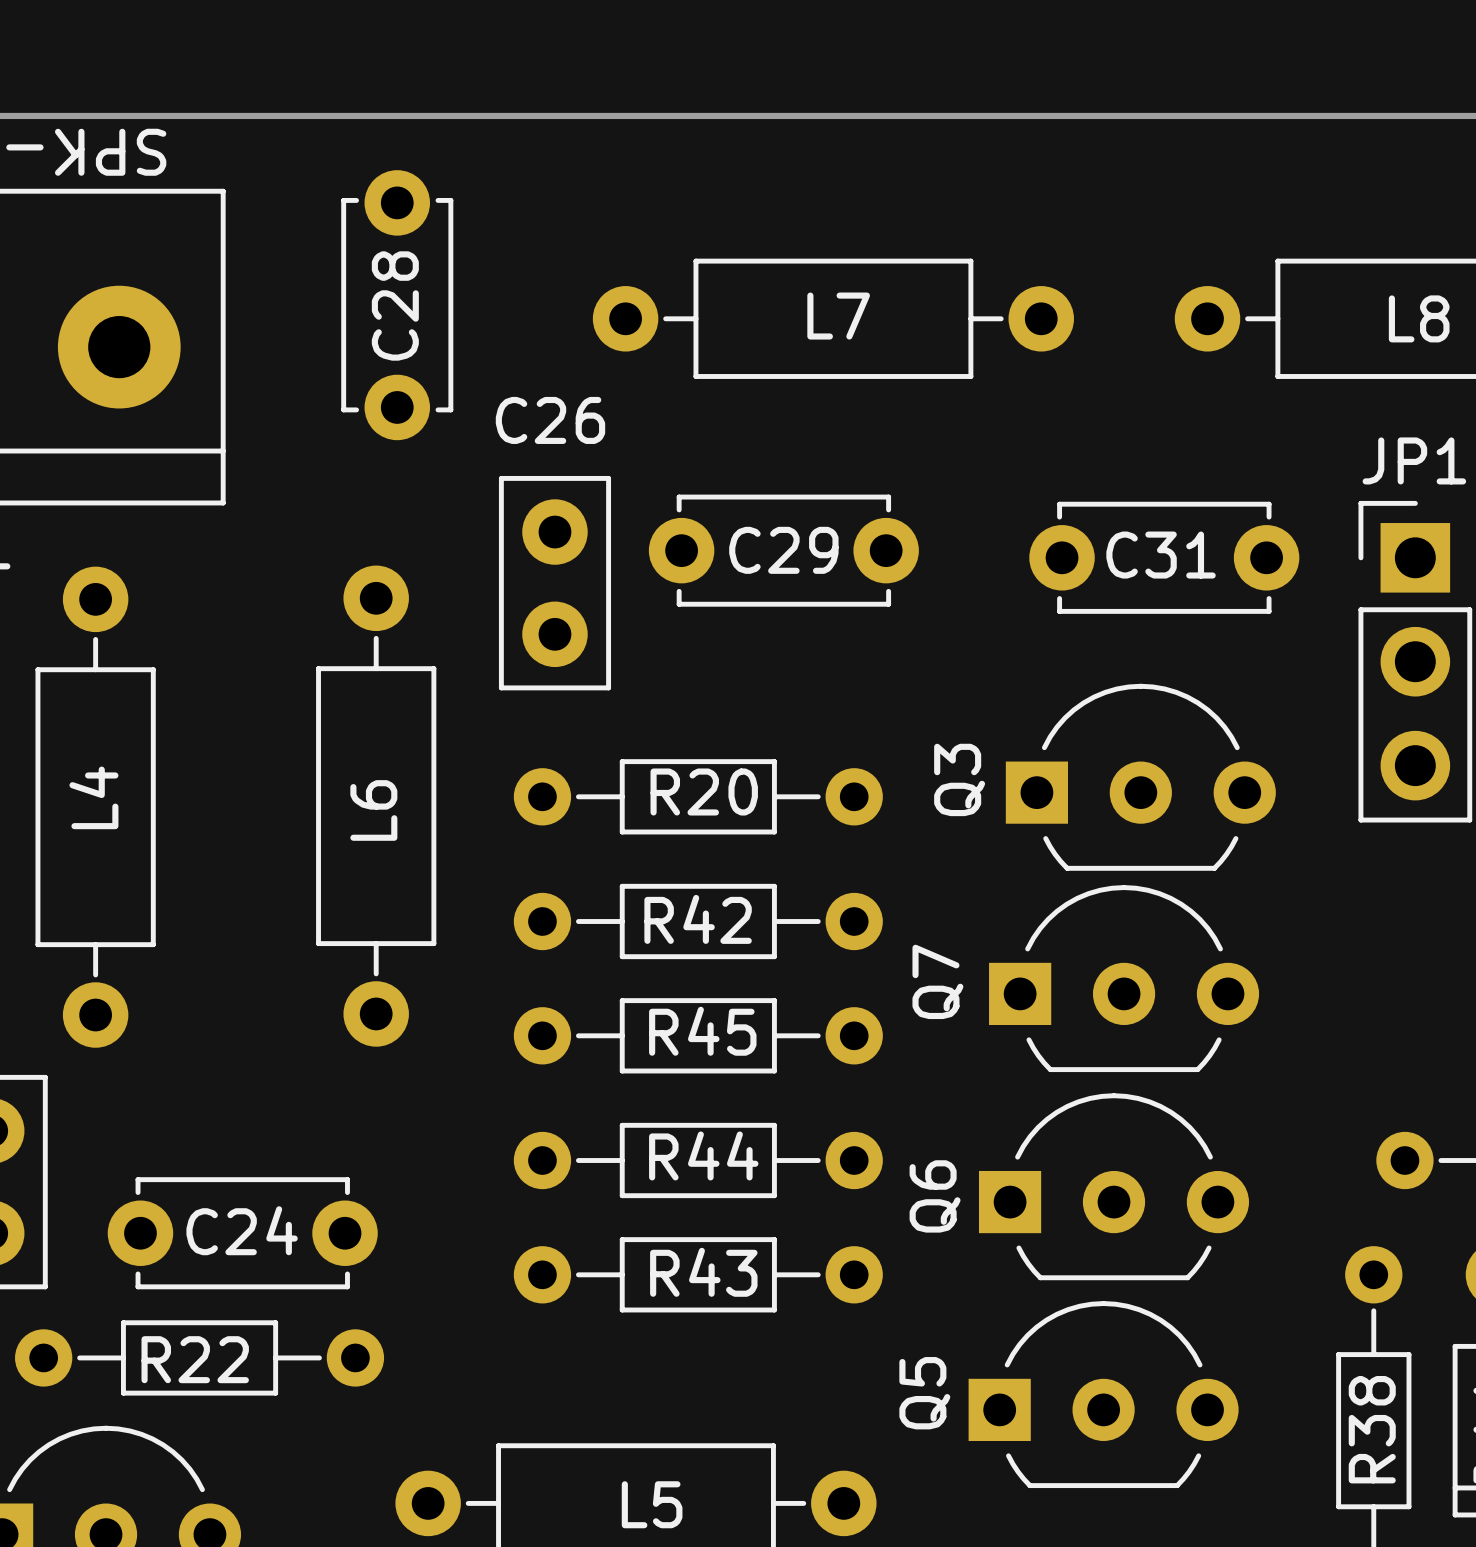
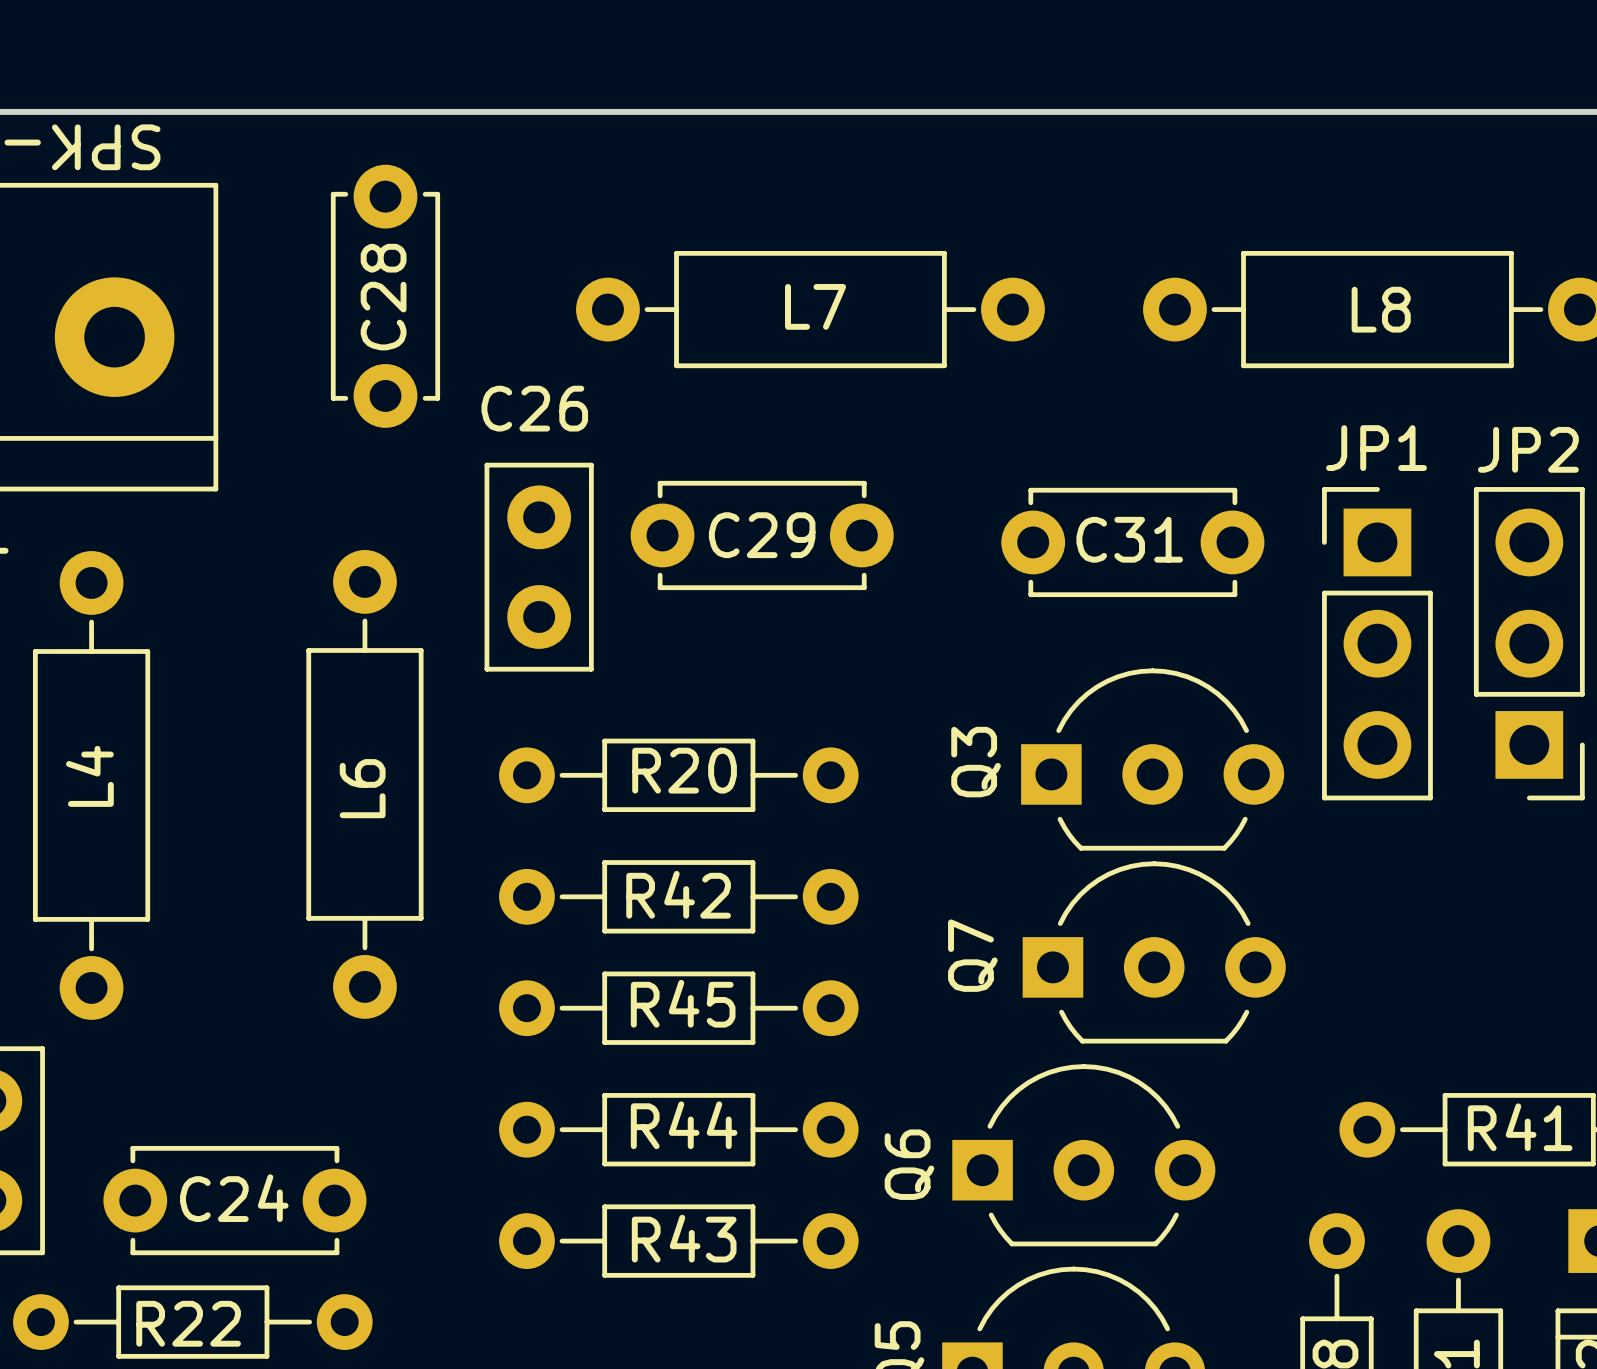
Q3 position: (1140, 777) -> (1152, 759)
Q7 position: (1124, 978) -> (1154, 952)

